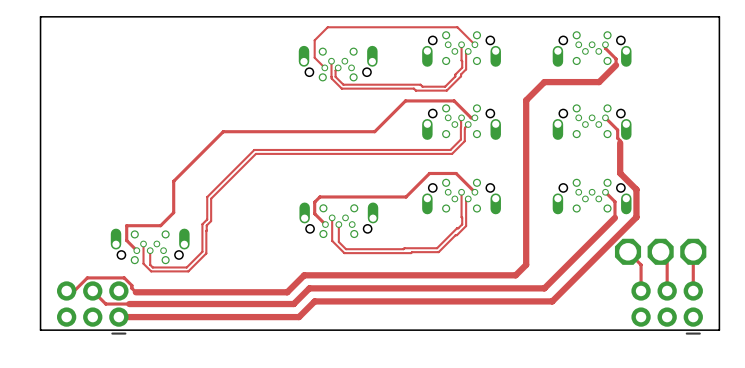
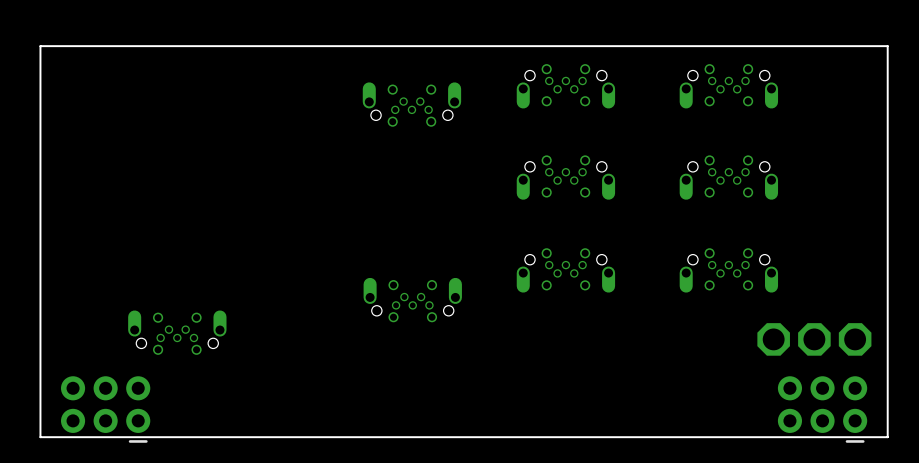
top track: (461, 44) (462, 67) (445, 86) (422, 86) (420, 84) (343, 84) (335, 76) (335, 70) (338, 67) -> none
top track: (474, 44) (457, 27) (327, 27) (314, 40) (314, 57) (324, 67) -> none
top track: (605, 44) (605, 48) (616, 58) (616, 65) (599, 82) (544, 82) (526, 100) (526, 264) (515, 275) (304, 275) (287, 292) (135, 292) (124, 277) (87, 277) (74, 290) (66, 290) -> none
top track: (468, 51) (466, 53) (466, 69) (446, 90) (341, 88) (331, 78) (331, 61) -> none
top track: (461, 117) (460, 139) (450, 149) (254, 149) (207, 197) (207, 219) (202, 224) (202, 251) (186, 267) (152, 267) (150, 264) (150, 250) -> none
top track: (474, 117) (471, 117) (454, 100) (405, 100) (374, 131) (223, 131) (173, 181) (173, 212) (160, 225) (126, 225) (126, 240) (136, 250) -> none
top track: (605, 117) (617, 130) (617, 138) (620, 140) (620, 173) (636, 189) (636, 217) (552, 301) (314, 301) (299, 317) (118, 317) -> none
top track: (468, 124) (465, 127) (464, 141) (452, 153) (255, 153) (211, 198) (211, 221) (206, 225) (206, 253) (188, 271) (151, 271) (143, 263) (143, 243) -> none
top track: (461, 192) (462, 224) (437, 248) (346, 249) (338, 242) (338, 224) -> none
top track: (474, 192) (456, 173) (429, 173) (406, 196) (319, 196) (314, 202) (314, 213) (325, 224) -> none
top track: (605, 192) (614, 201) (614, 217) (544, 288) (309, 288) (293, 304) (105, 304) (92, 290) -> none
top track: (468, 198) (466, 201) (466, 226) (438, 252) (344, 253) (332, 240) (332, 217) -> none
top track: (628, 251) (641, 264) (641, 290) -> none
top track: (660, 251) (667, 258) (667, 290) -> none
top track: (693, 251) (693, 290) -> none

